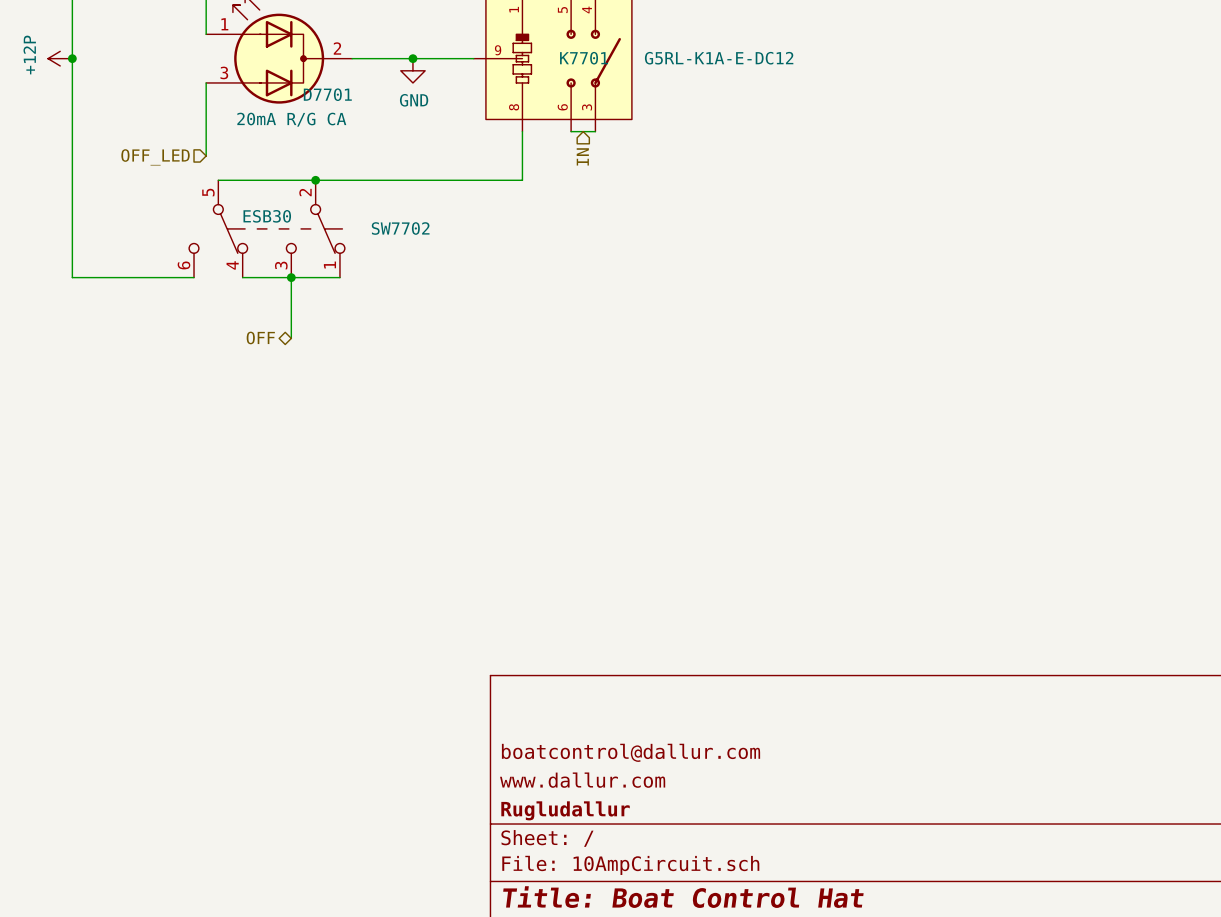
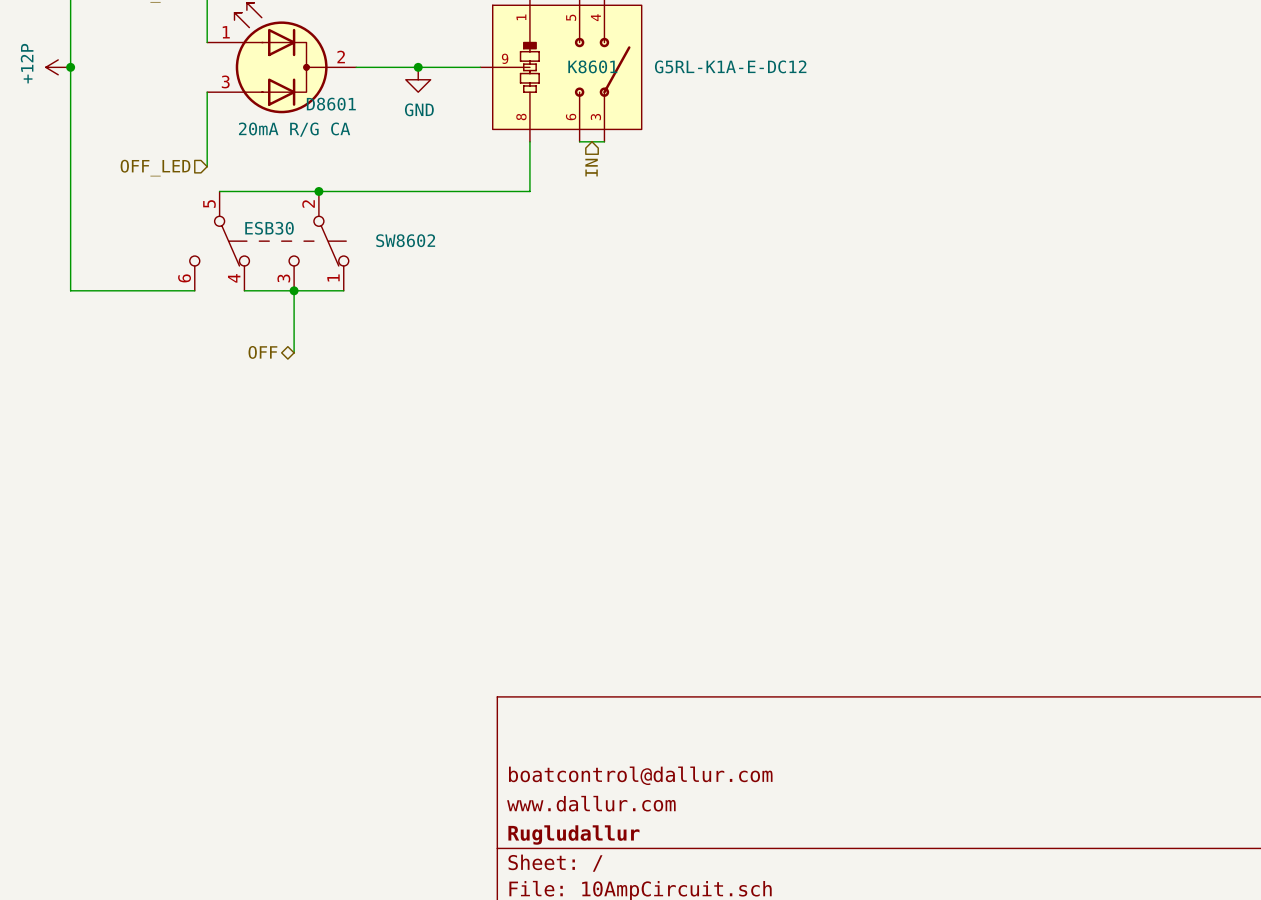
K7701 name: K7701 (584, 58) -> K8601 (592, 66)
D7701 name: D7701 (327, 94) -> D8601 (331, 104)
SW7702 name: SW7702 (400, 228) -> SW8602 (405, 240)

